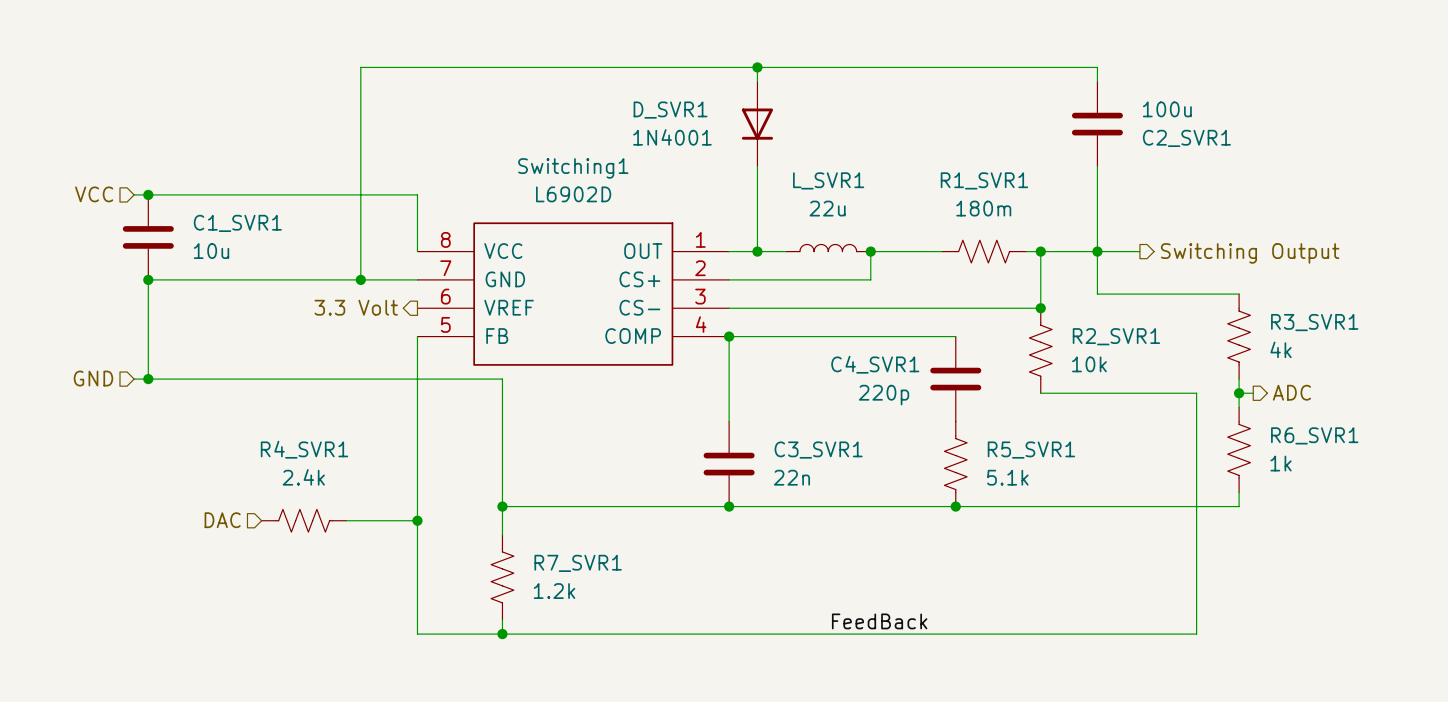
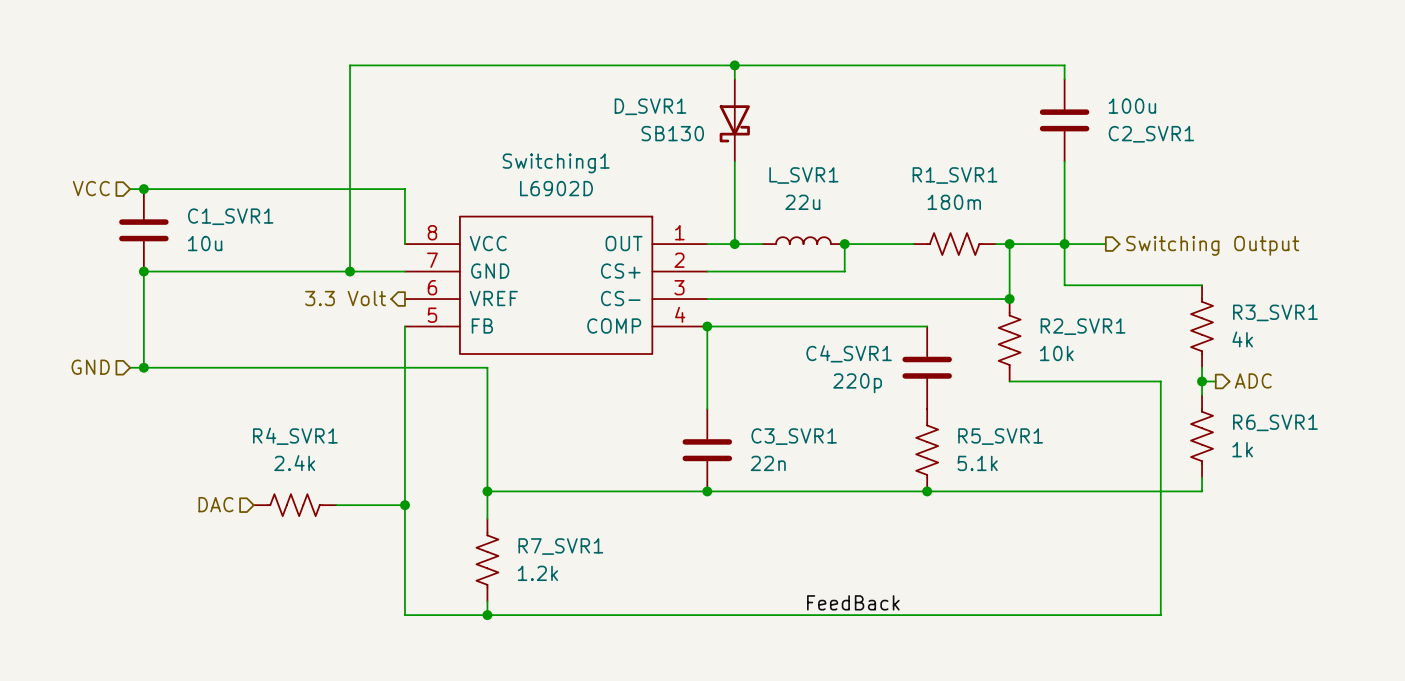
D_SVR1 symbol: [741, 81, 774, 167] -> [719, 79, 750, 162]
D_SVR1 value: 1N4001 (672, 137) -> SB130 (672, 133)

